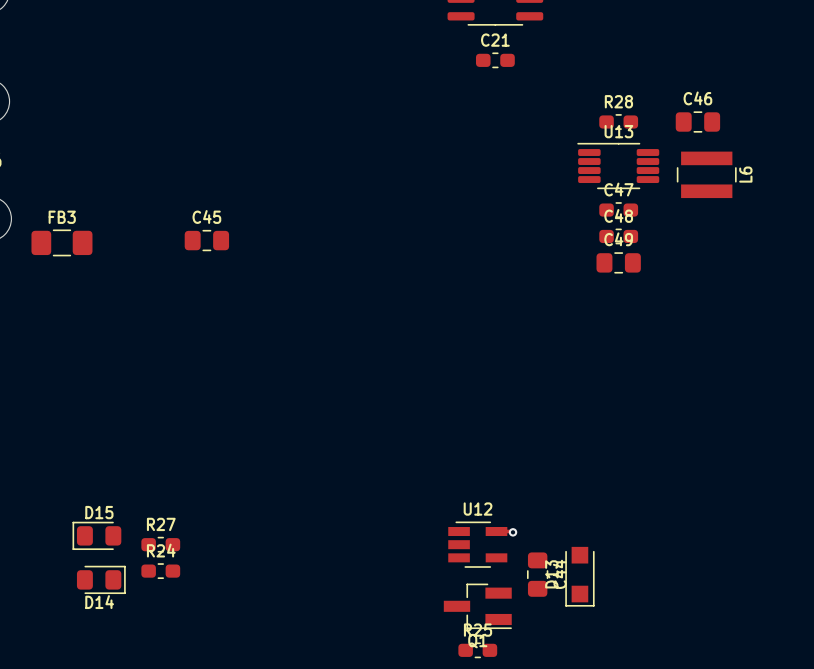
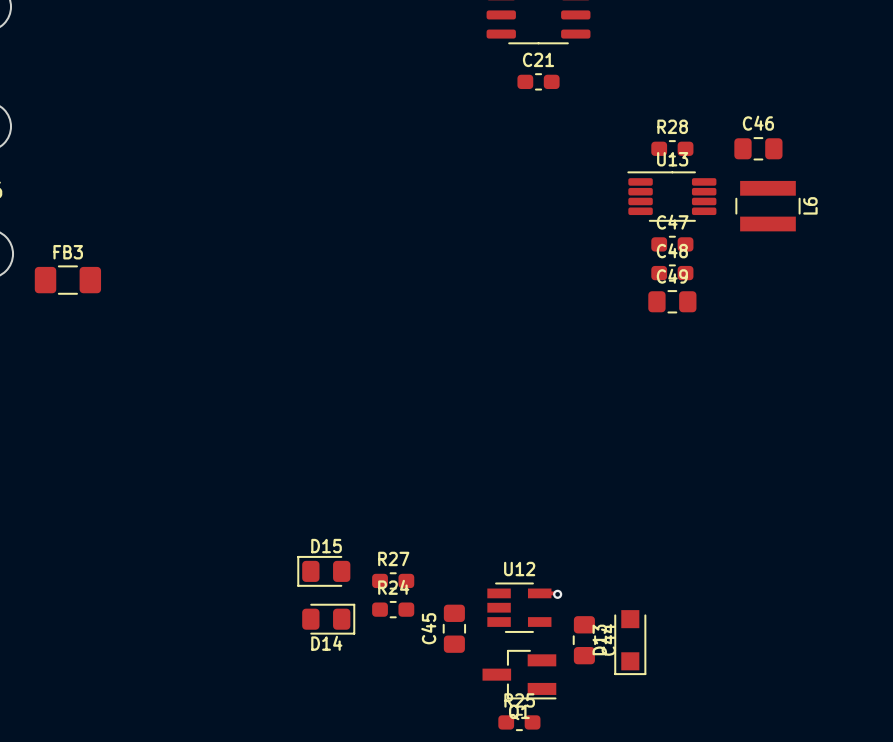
C45 name position: C45 (206, 216) -> C45 (428, 628)
C45 rotation: 0° (206, 240) -> 90° clockwise (454, 628)
C45 position: (206, 240) -> (454, 628)
D15 position: (96, 535) -> (323, 571)
R27 position: (160, 544) -> (393, 580)
R24 position: (160, 571) -> (393, 609)
D14 position: (101, 579) -> (328, 619)

